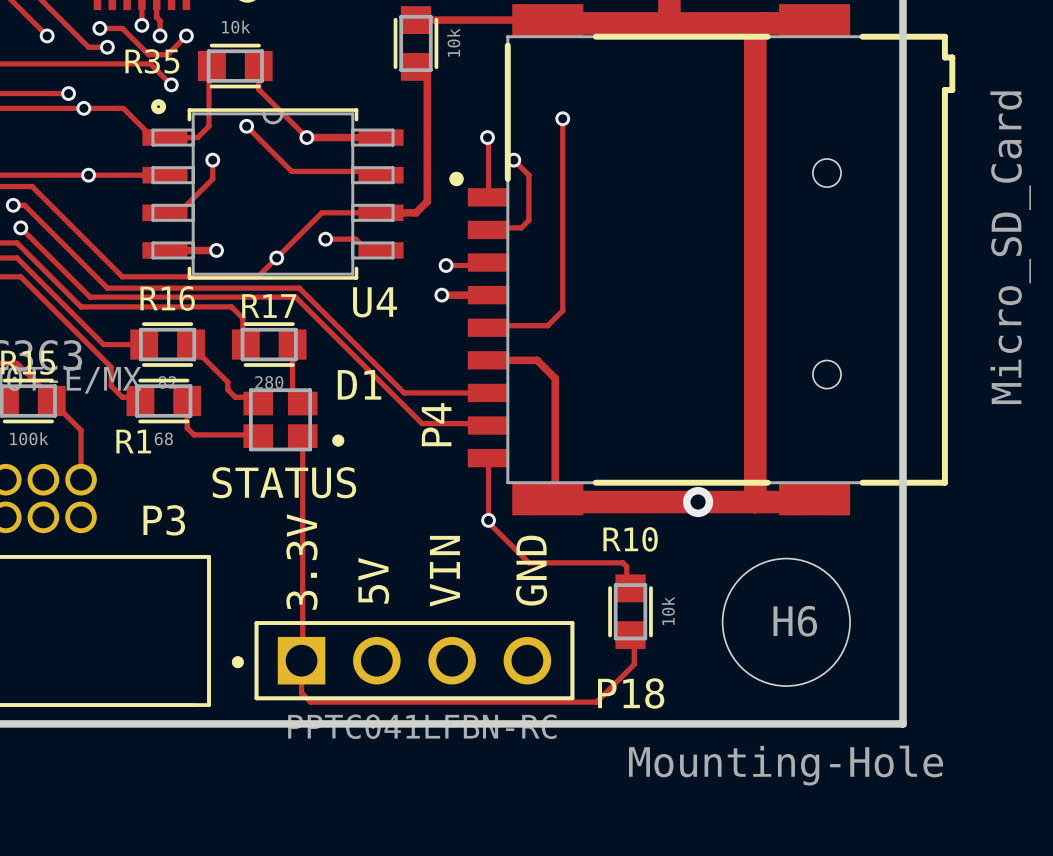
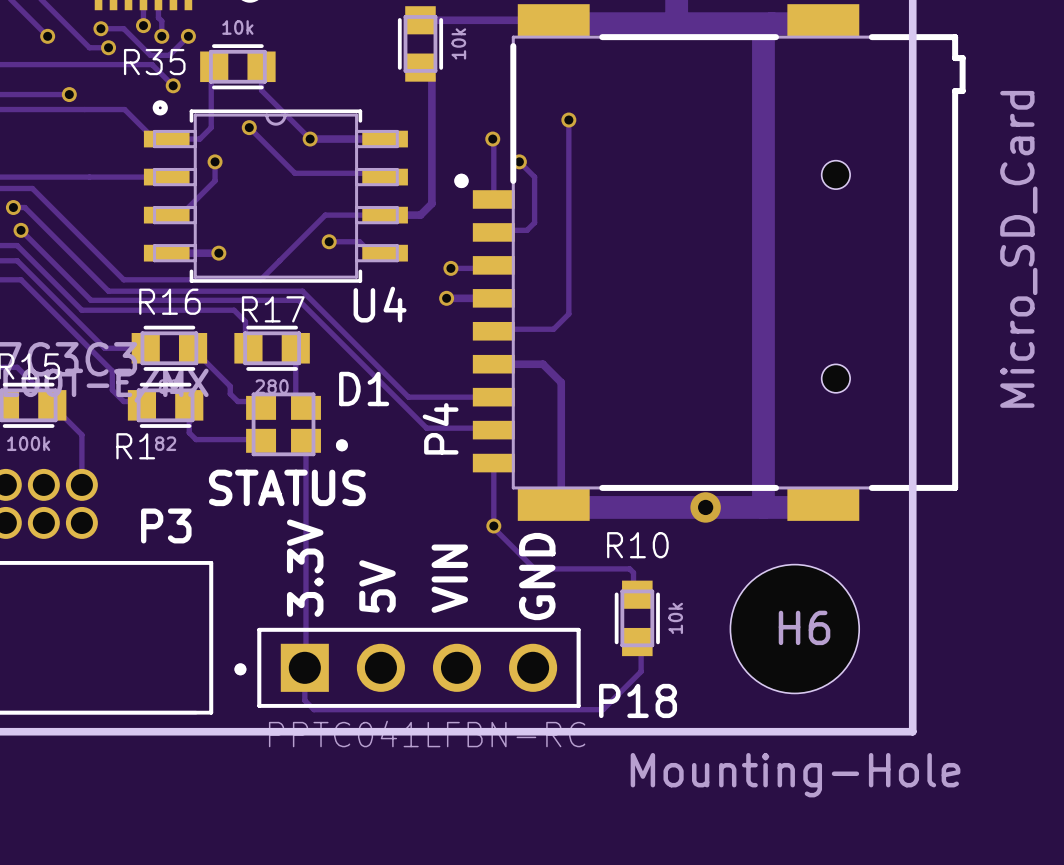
via: (83, 108) -> none
via: (88, 175) -> none
via: (276, 257) -> none
R1 value: 68 (163, 438) -> 82 (165, 443)

